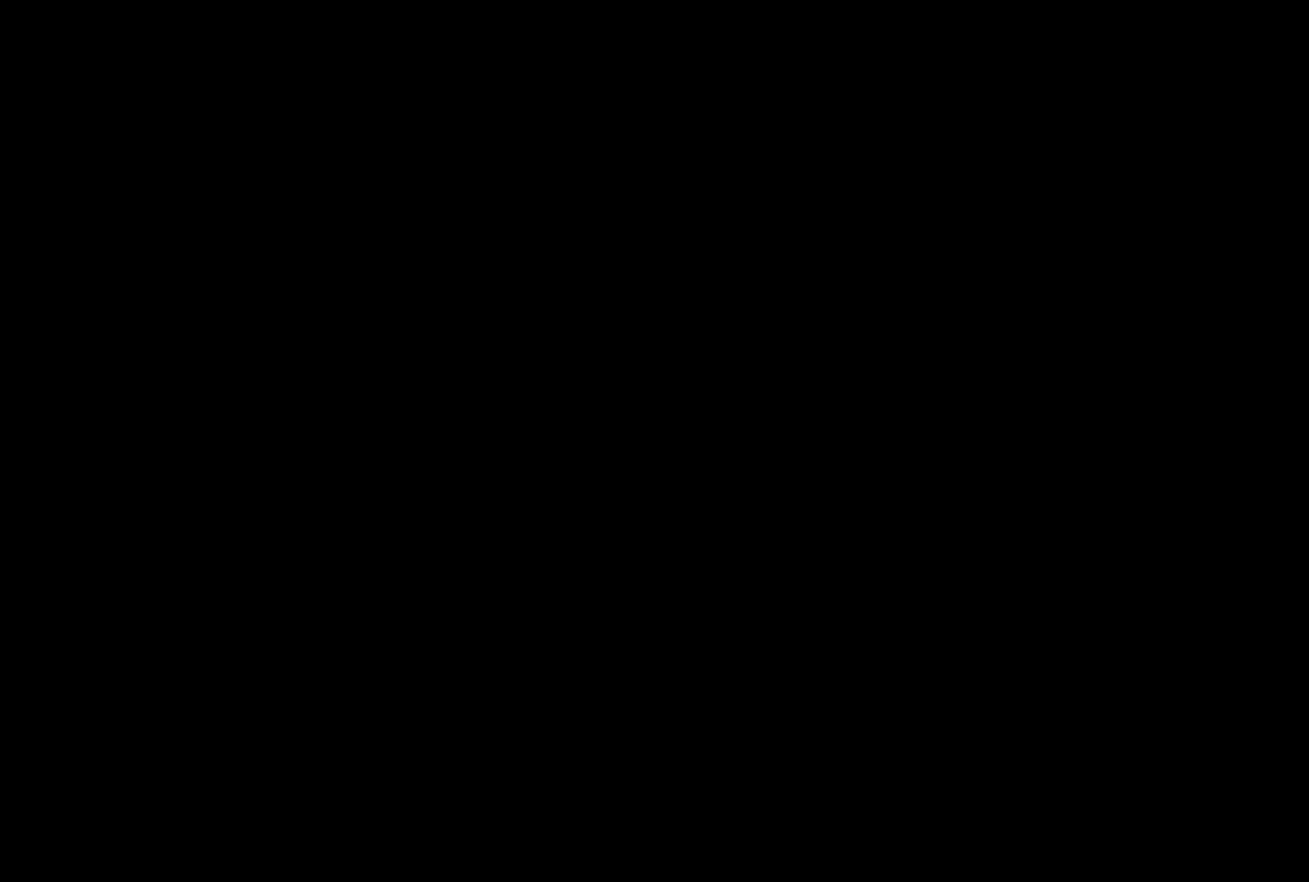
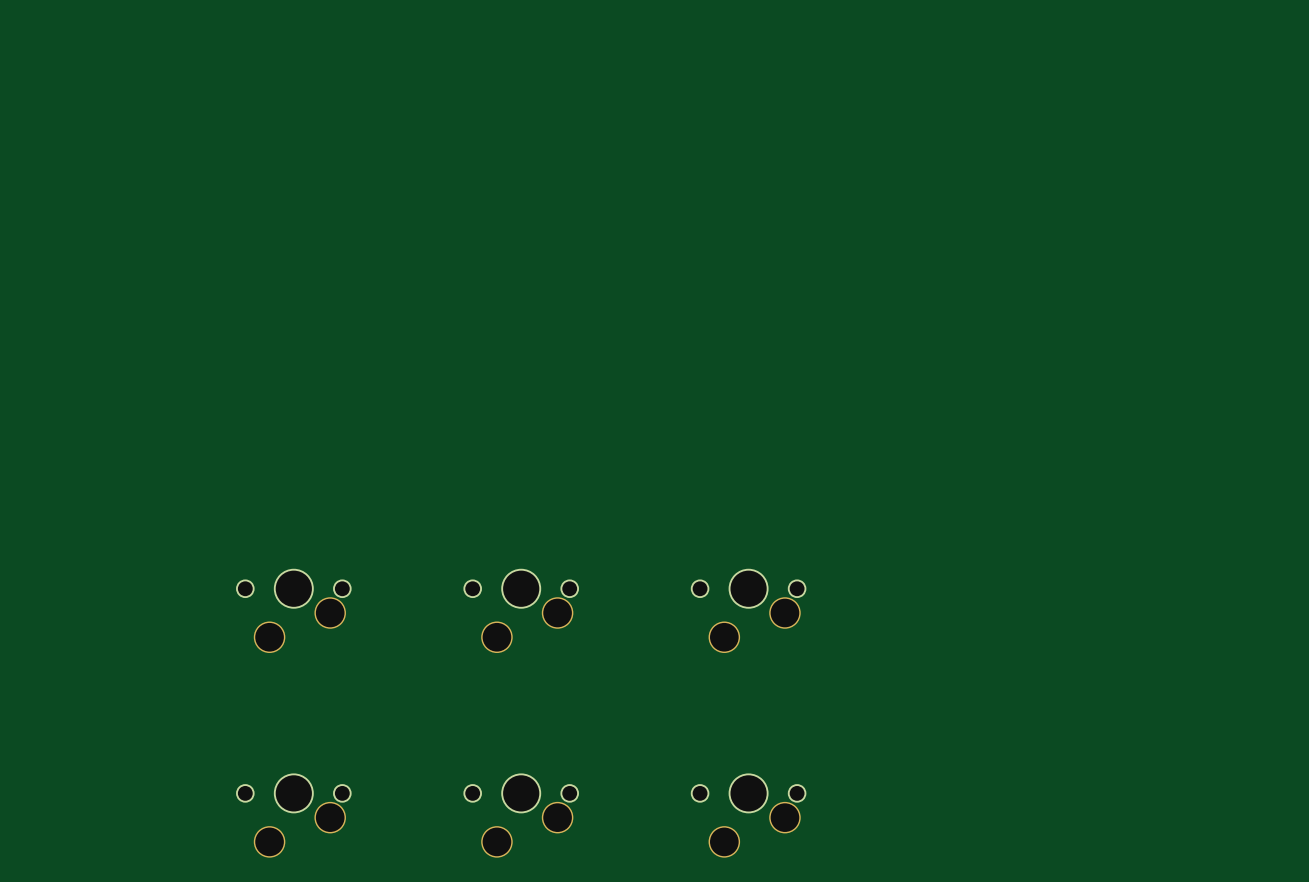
part: none -> (293, 611)
part: none -> (521, 611)
part: none -> (748, 611)
part: none -> (293, 816)
part: none -> (521, 816)
part: none -> (748, 816)

